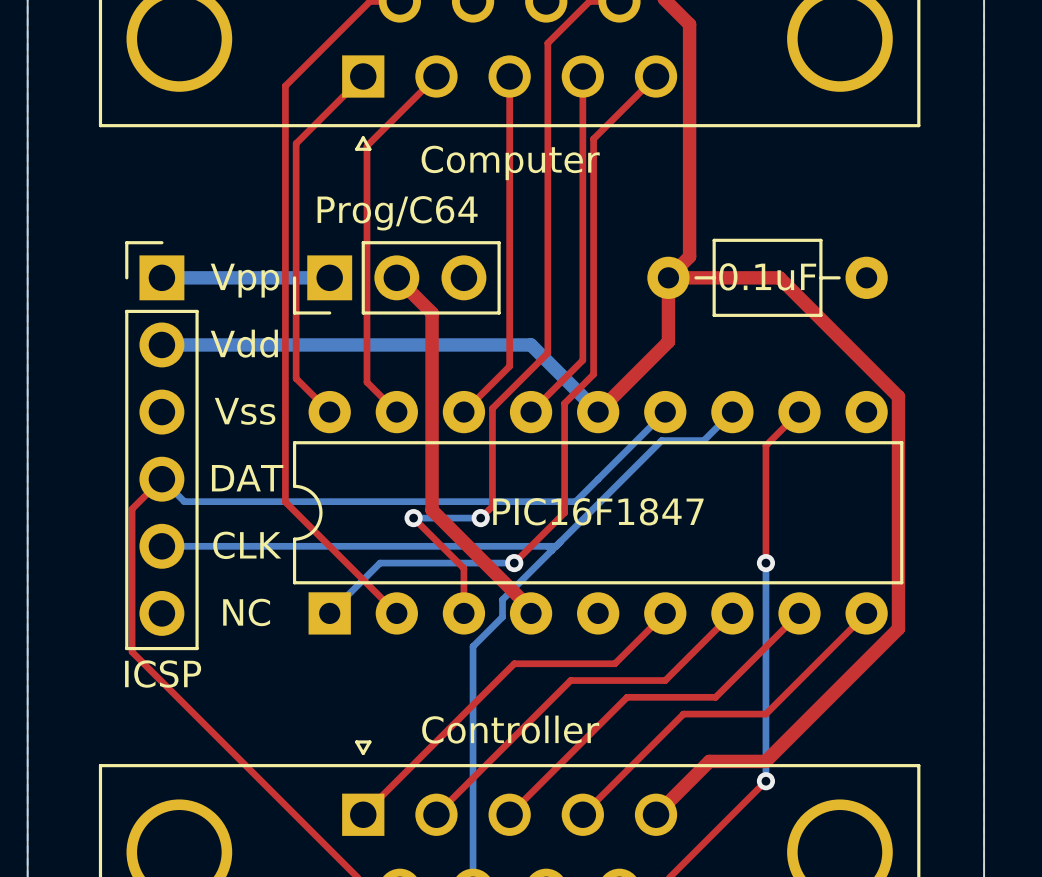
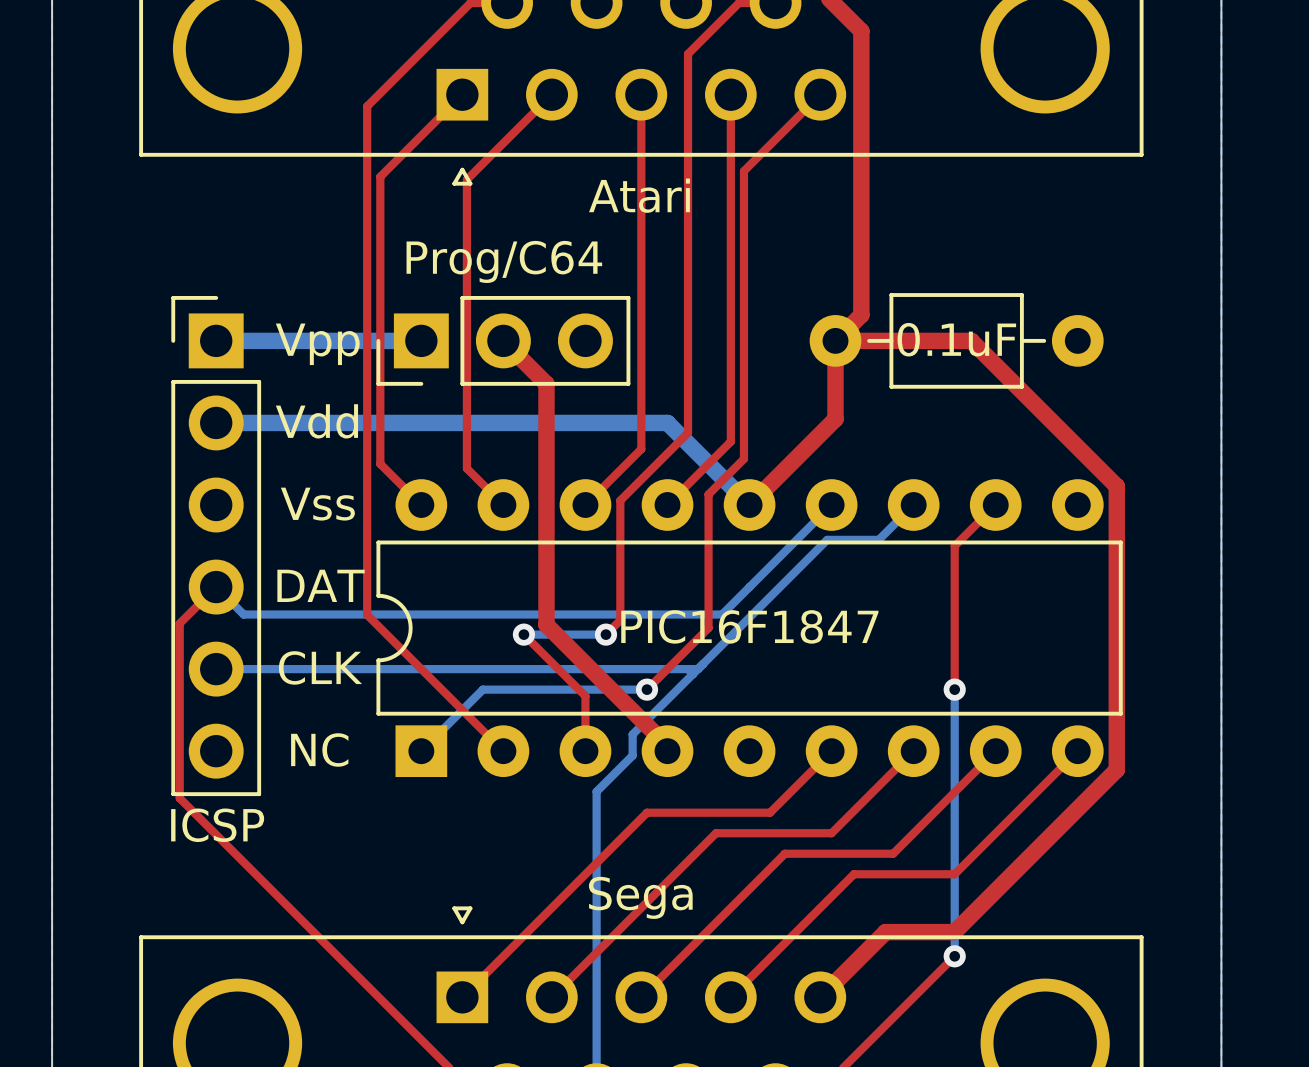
part value: Computer (510, 162) -> Atari (639, 195)
part value: Controller (510, 729) -> Sega (640, 897)

